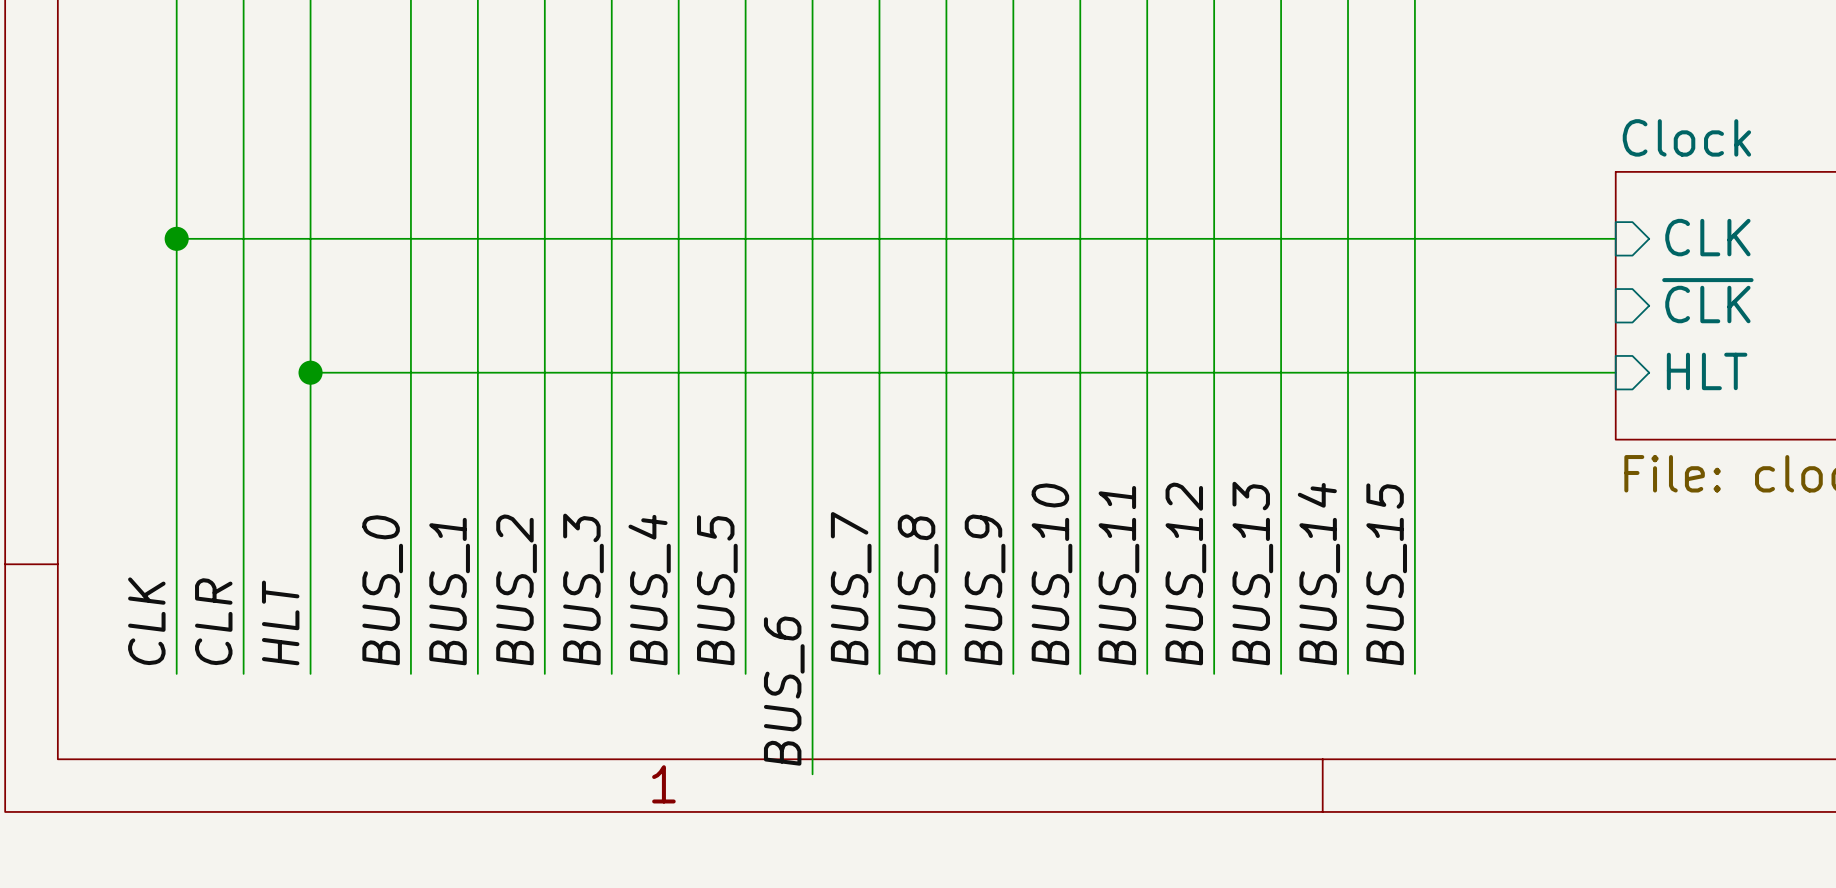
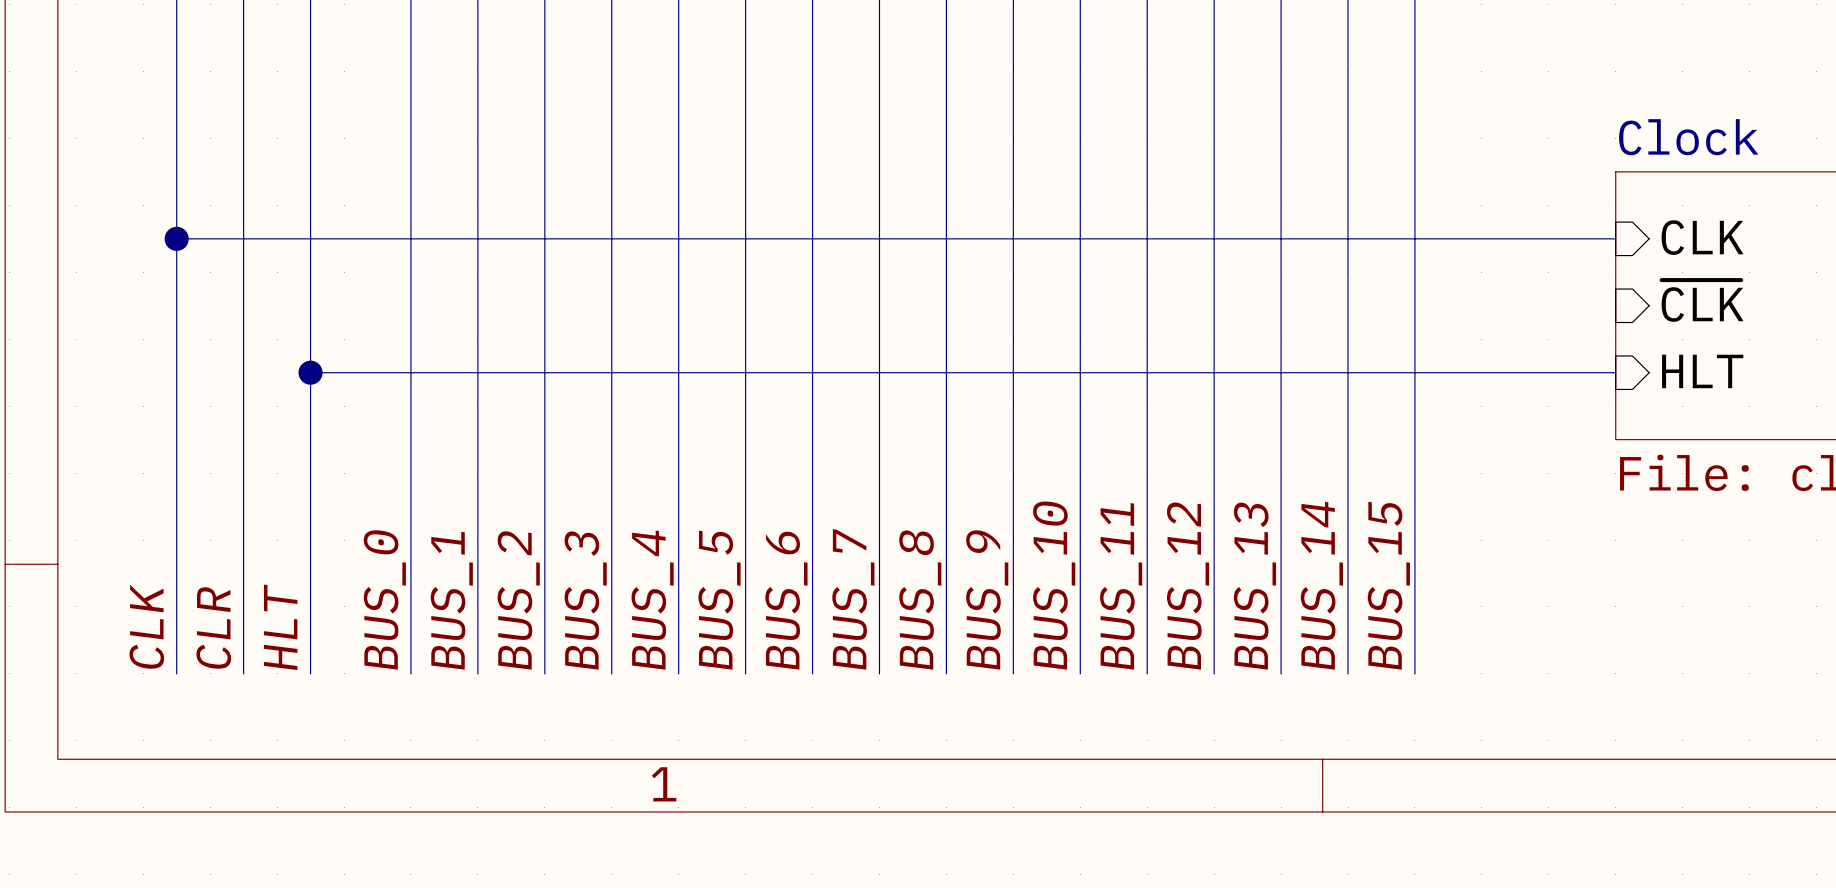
wire: (812, 673) (812, 774) -> none
label position: BUS_6 (784, 691) -> BUS_6 (786, 600)

